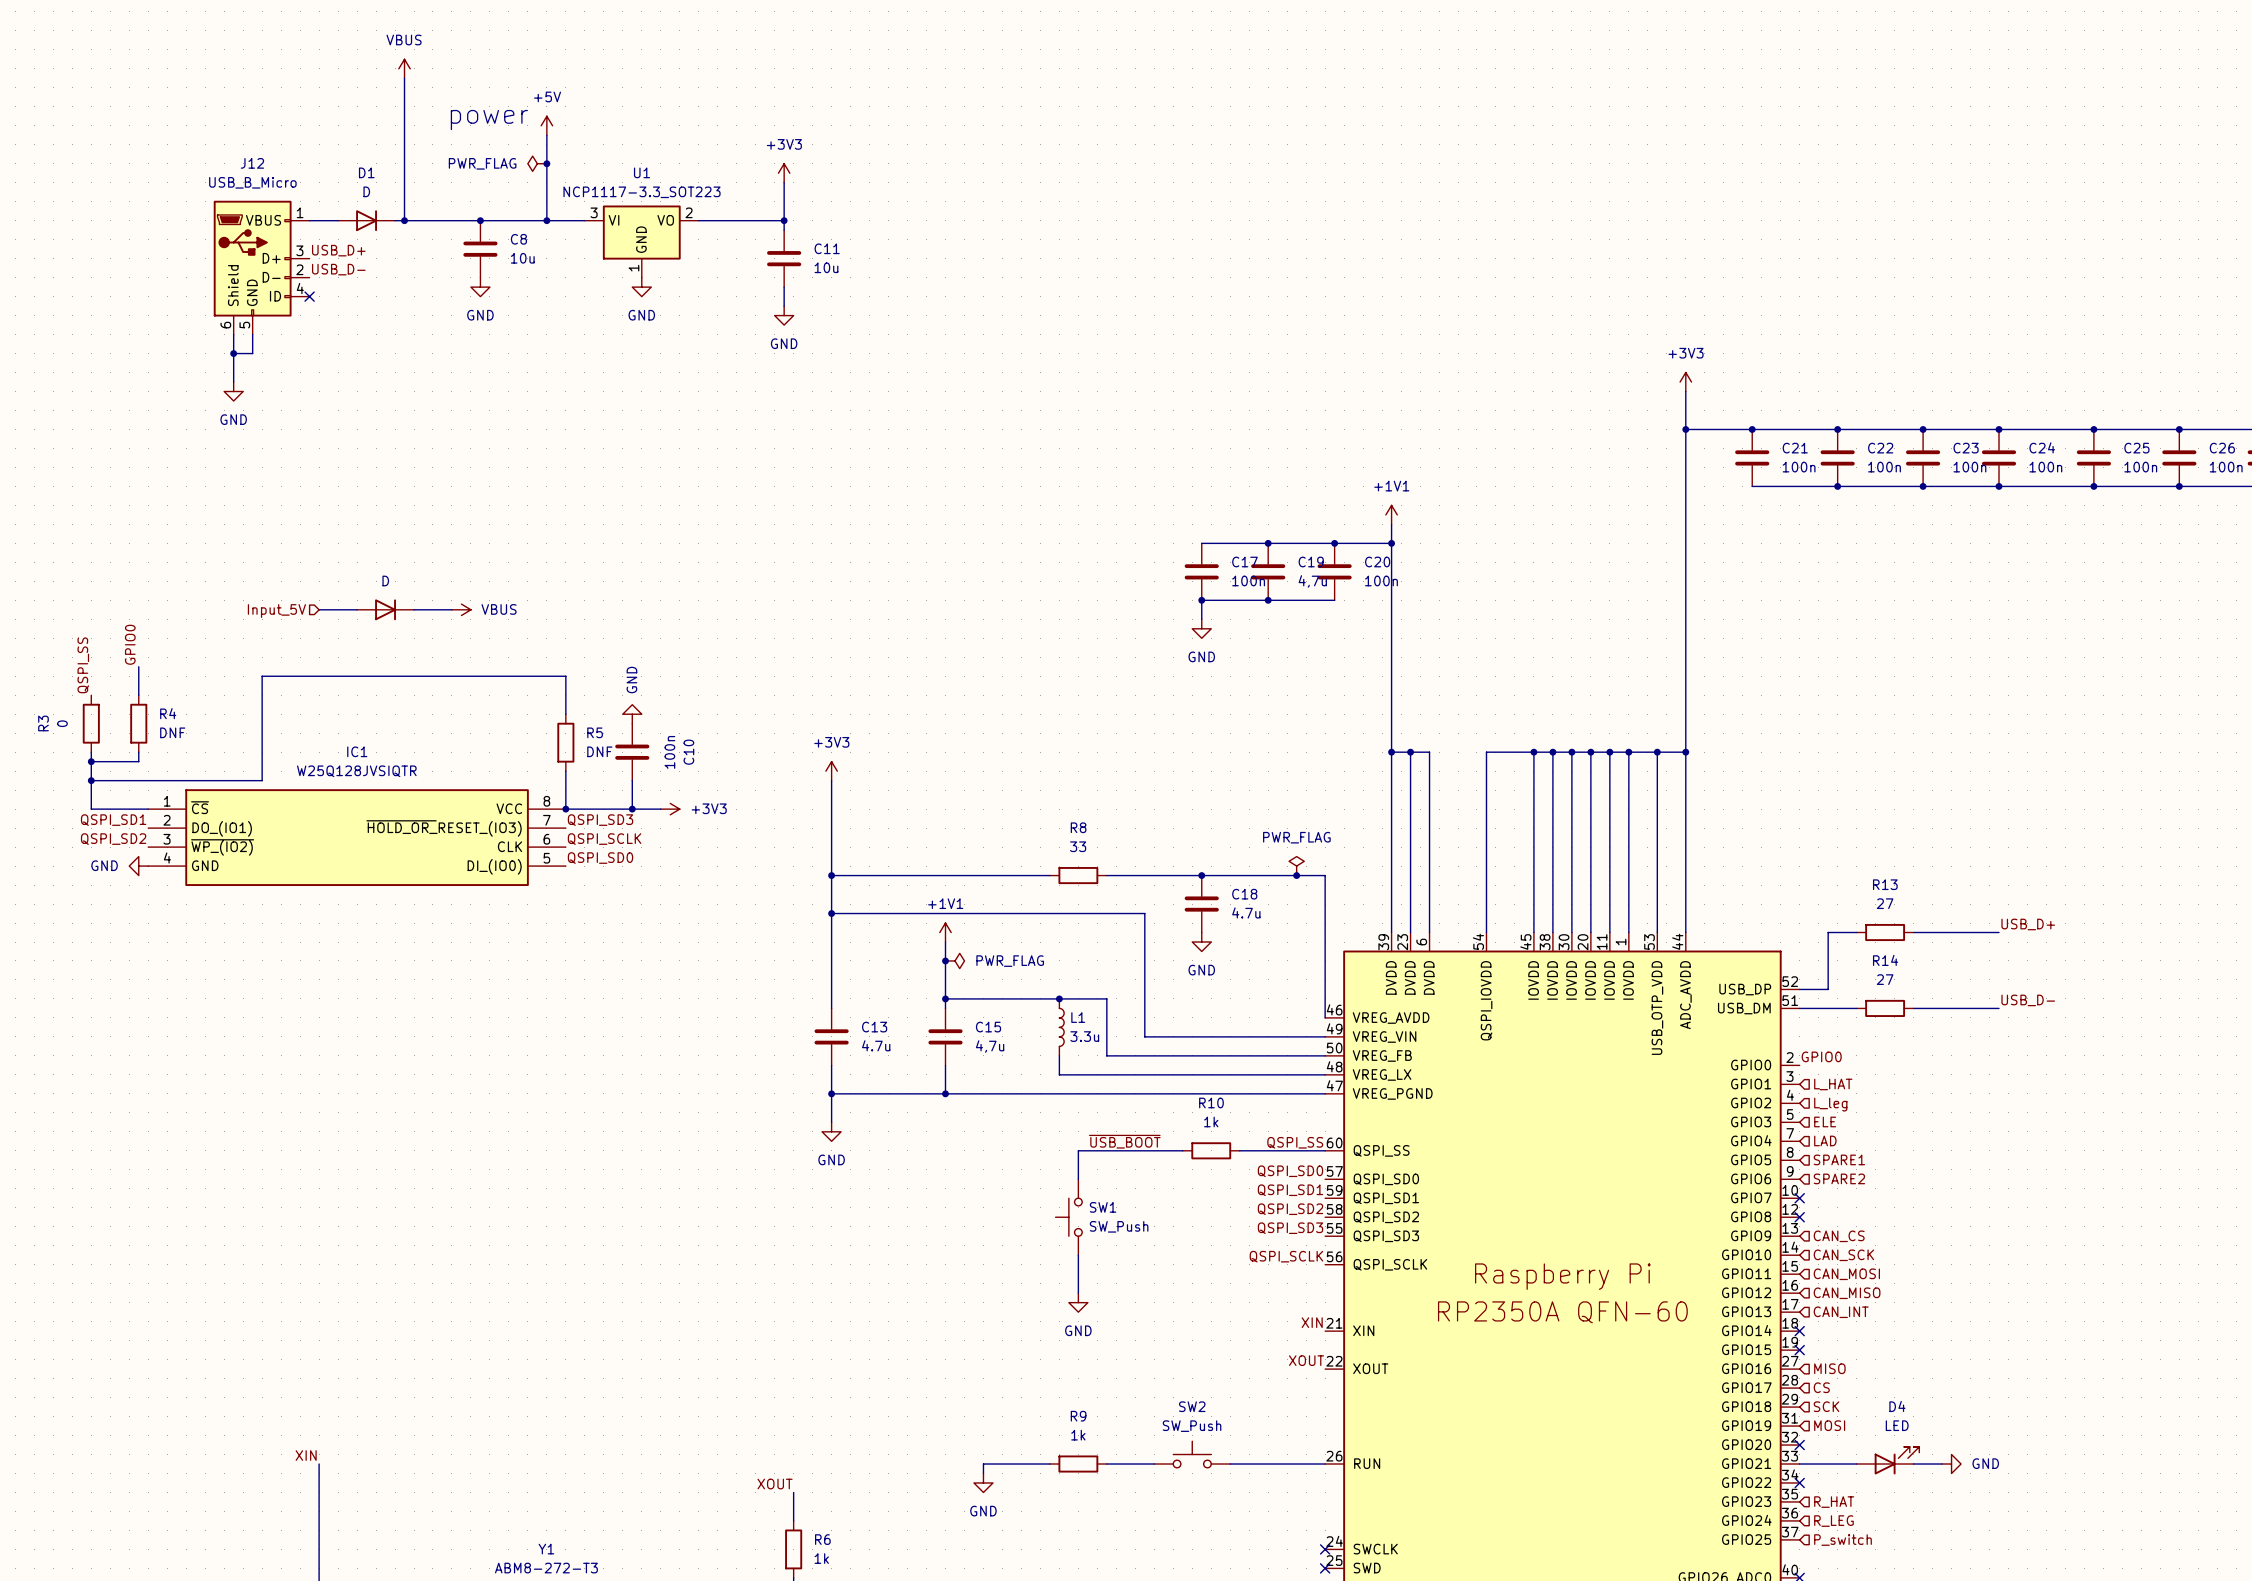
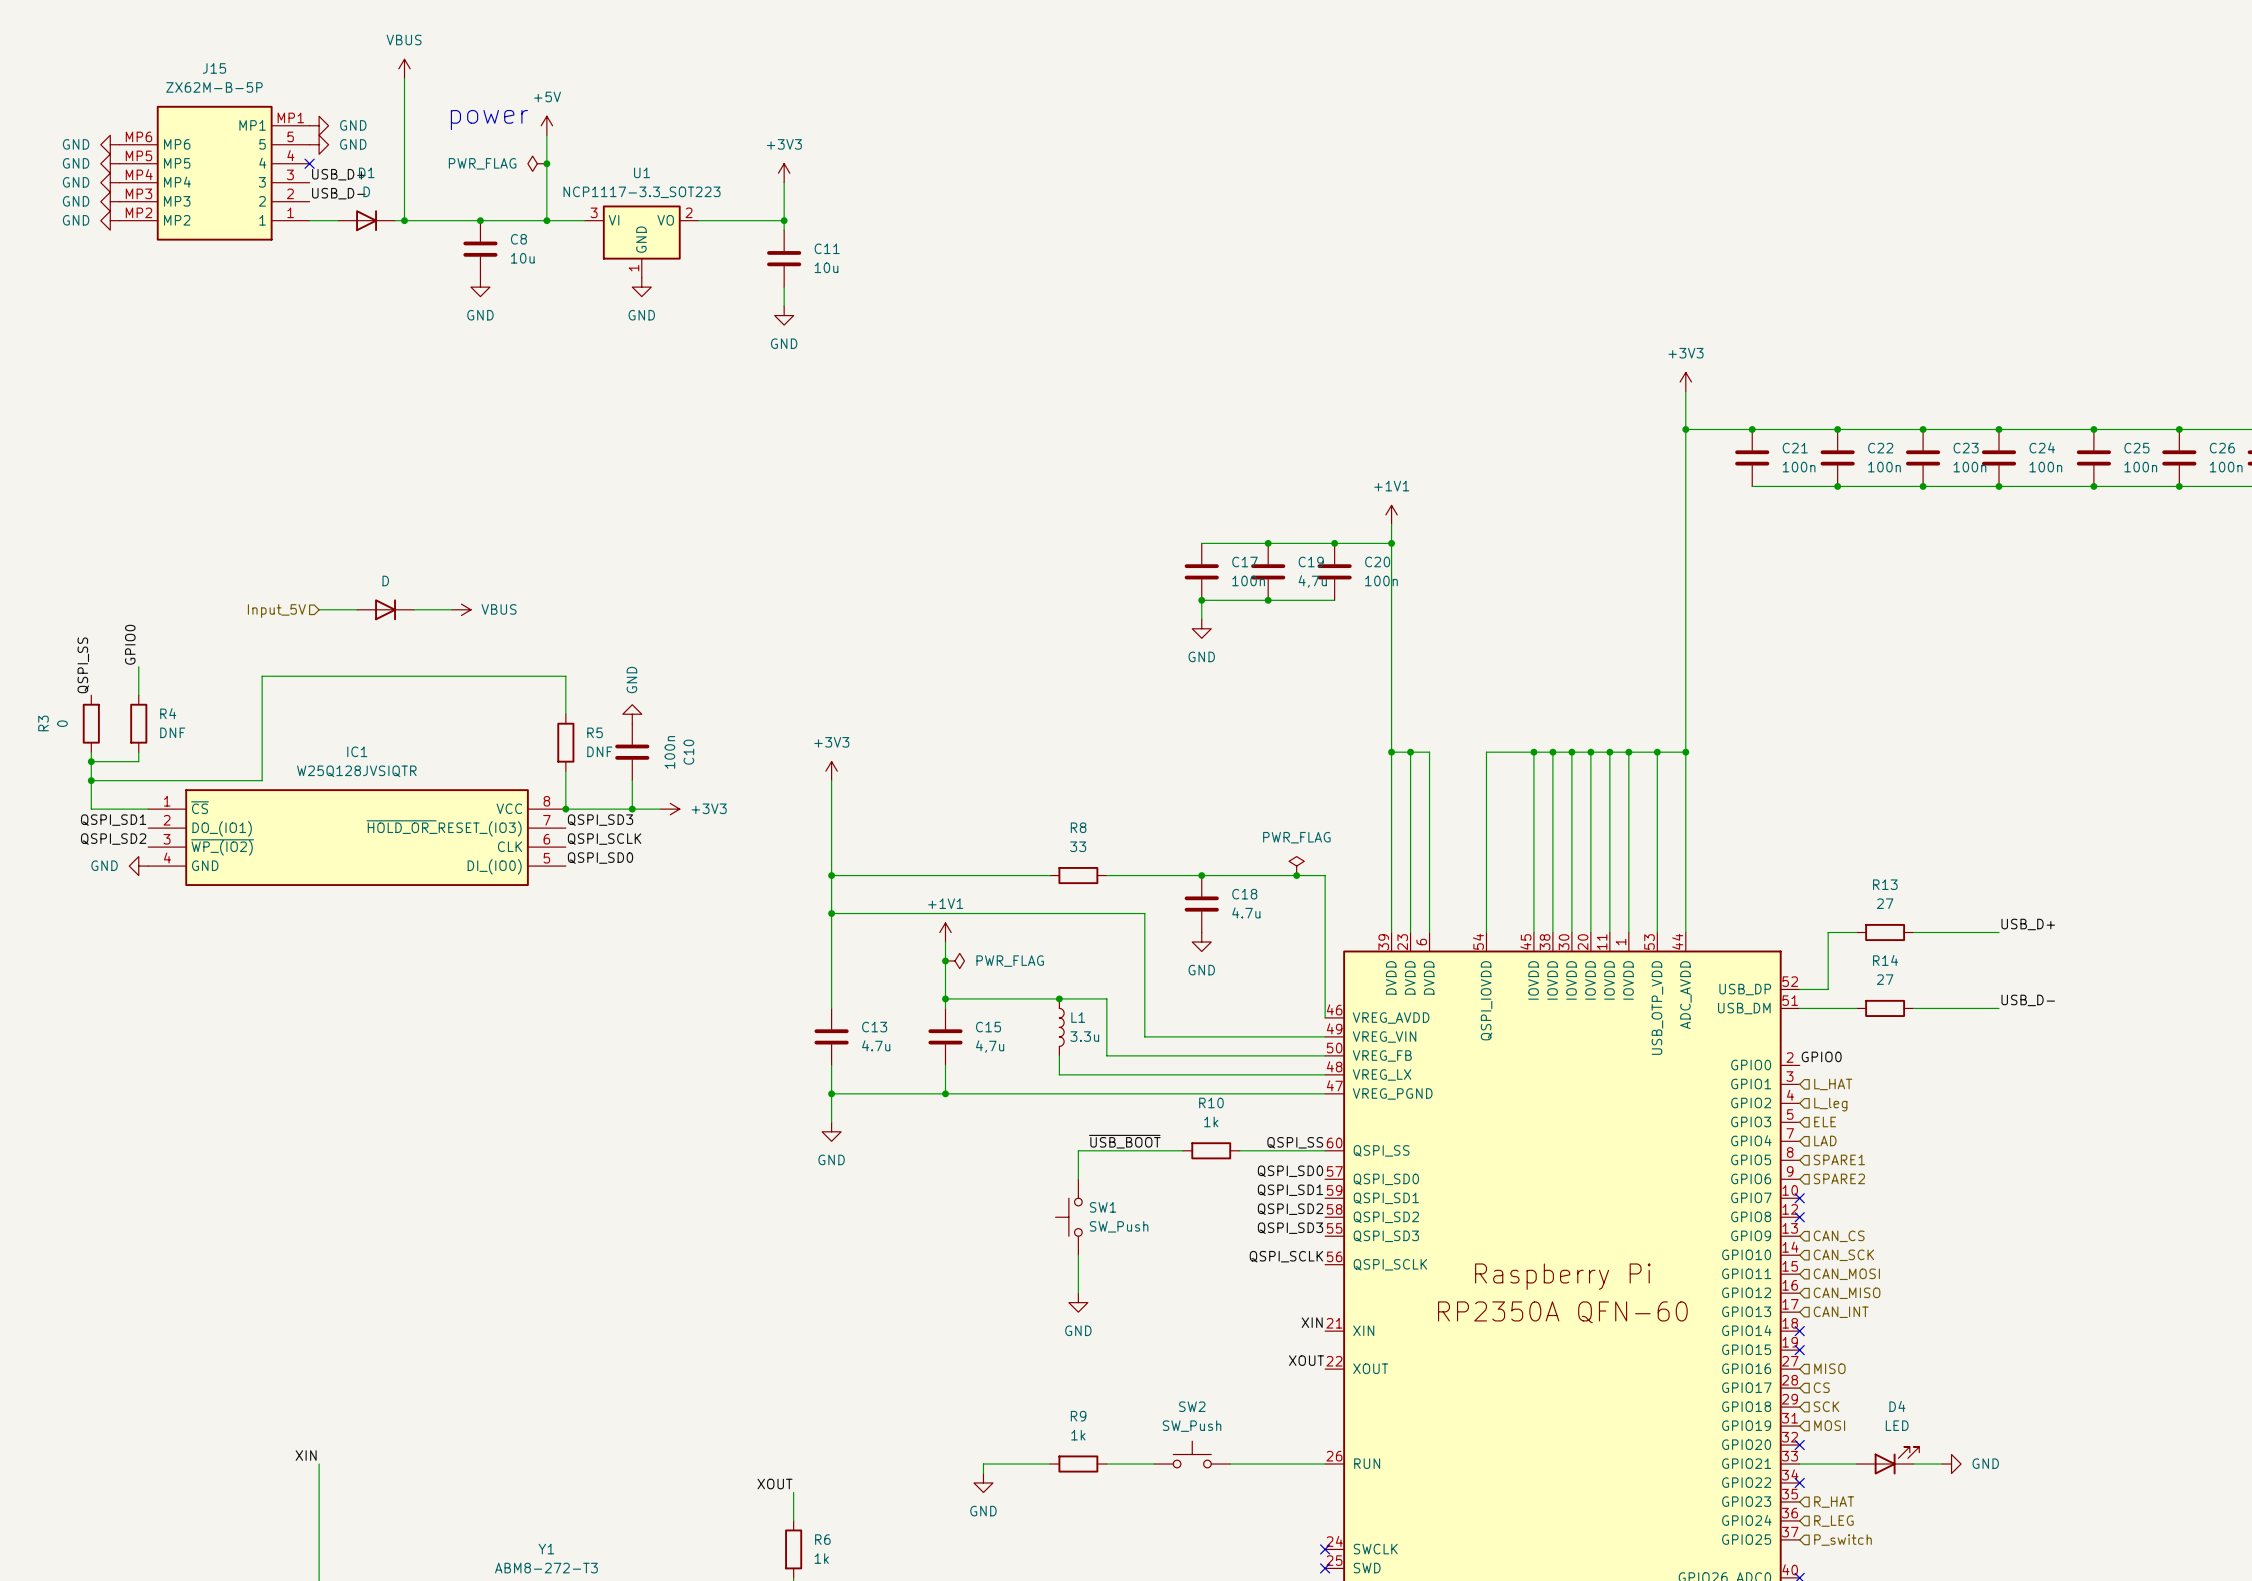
power symbol: none -> GND (319, 125)
power symbol: none -> GND (110, 144)
power symbol: none -> GND (319, 144)
power symbol: none -> GND (110, 163)
no-connect mark: none -> (309, 163)
J15: none -> ZX62M-B-5P (214, 173)
power symbol: none -> GND (110, 182)
power symbol: none -> GND (110, 201)
power symbol: none -> GND (110, 220)
label position: USB_D+ (338, 250) -> USB_D+ (338, 174)
J12: USB_B_Micro (261, 267) -> none
label position: USB_D- (338, 269) -> USB_D- (338, 193)
no-connect mark: (309, 296) -> none
wire: (233, 334) (233, 382) -> none
wire: (252, 334) (252, 353) (233, 353) -> none
junction: (233, 353) -> none
power symbol: GND (233, 391) -> none

